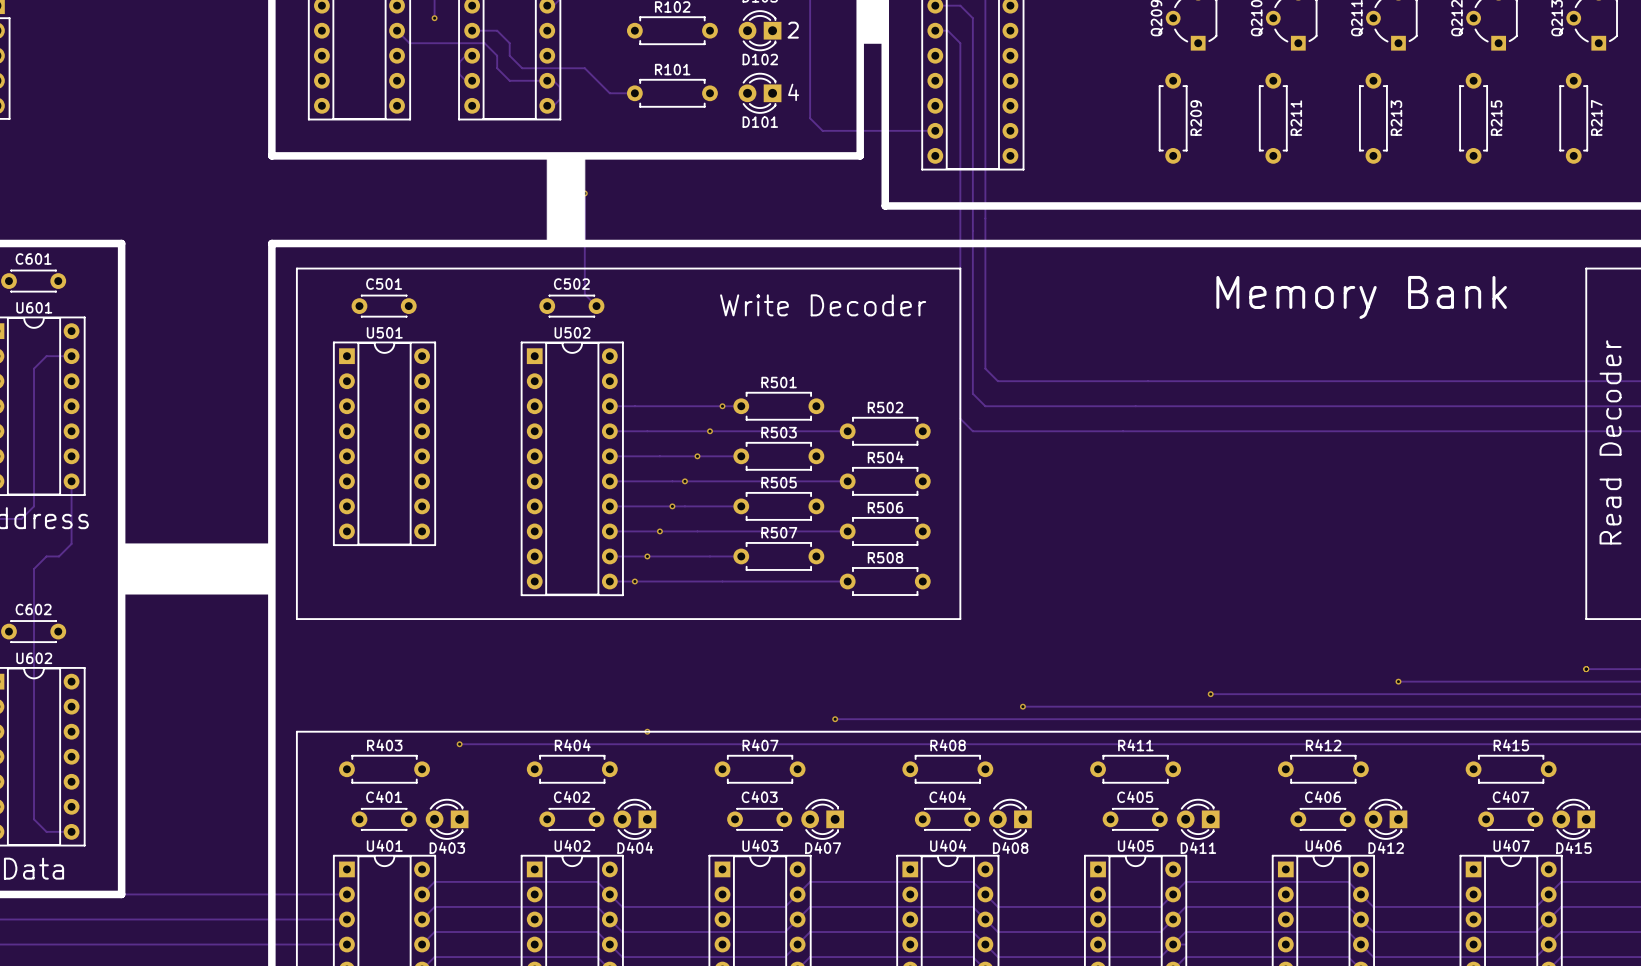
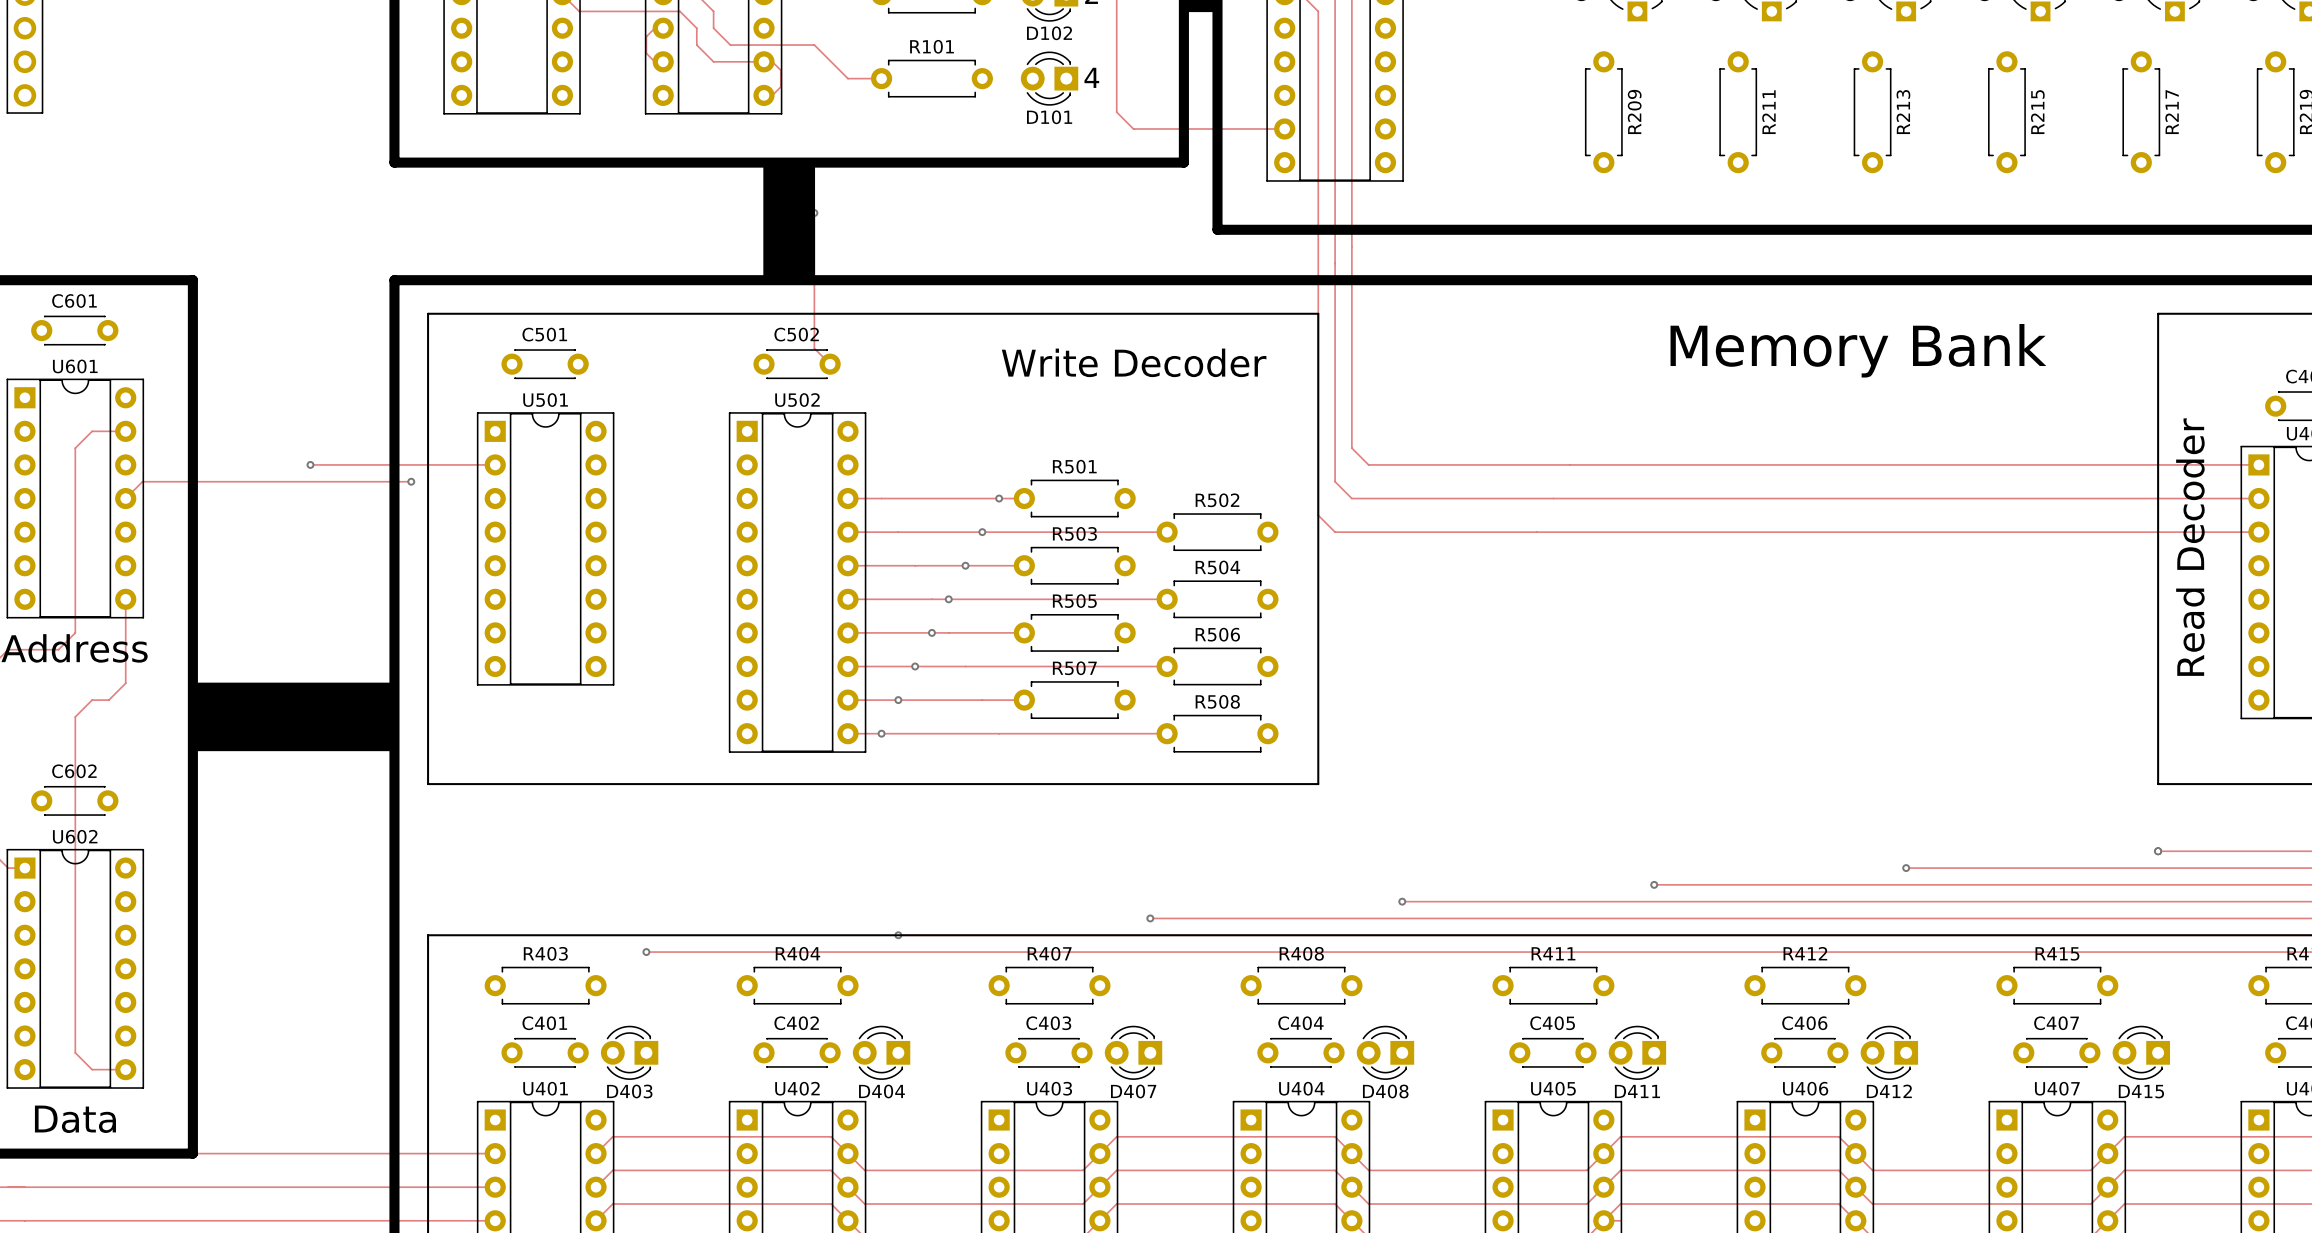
track: none -> (310, 464) (495, 464)
via: none -> (310, 464)
track: none -> (411, 481) (142, 481) (125, 498)
via: none -> (411, 481)

